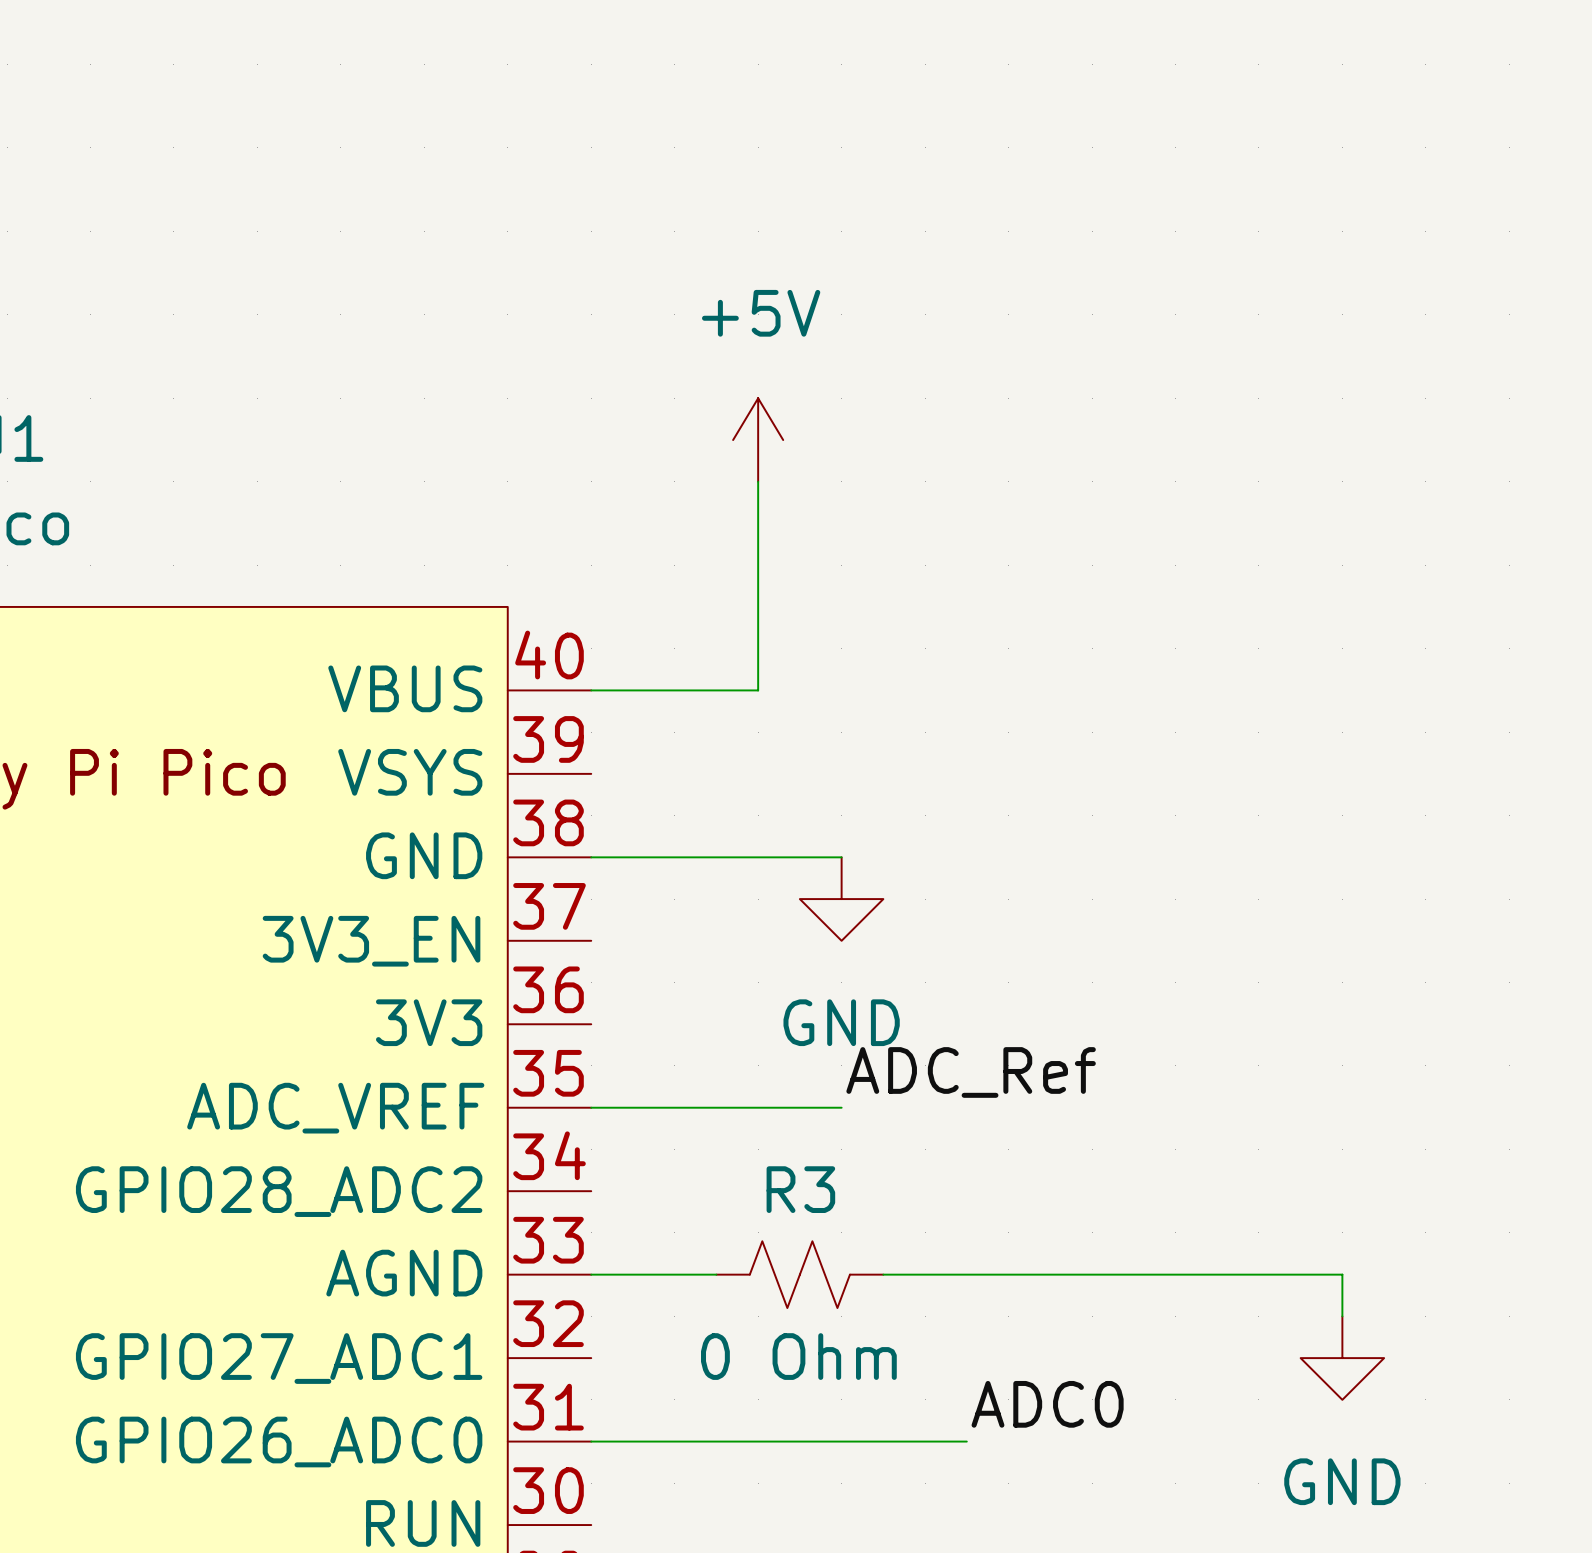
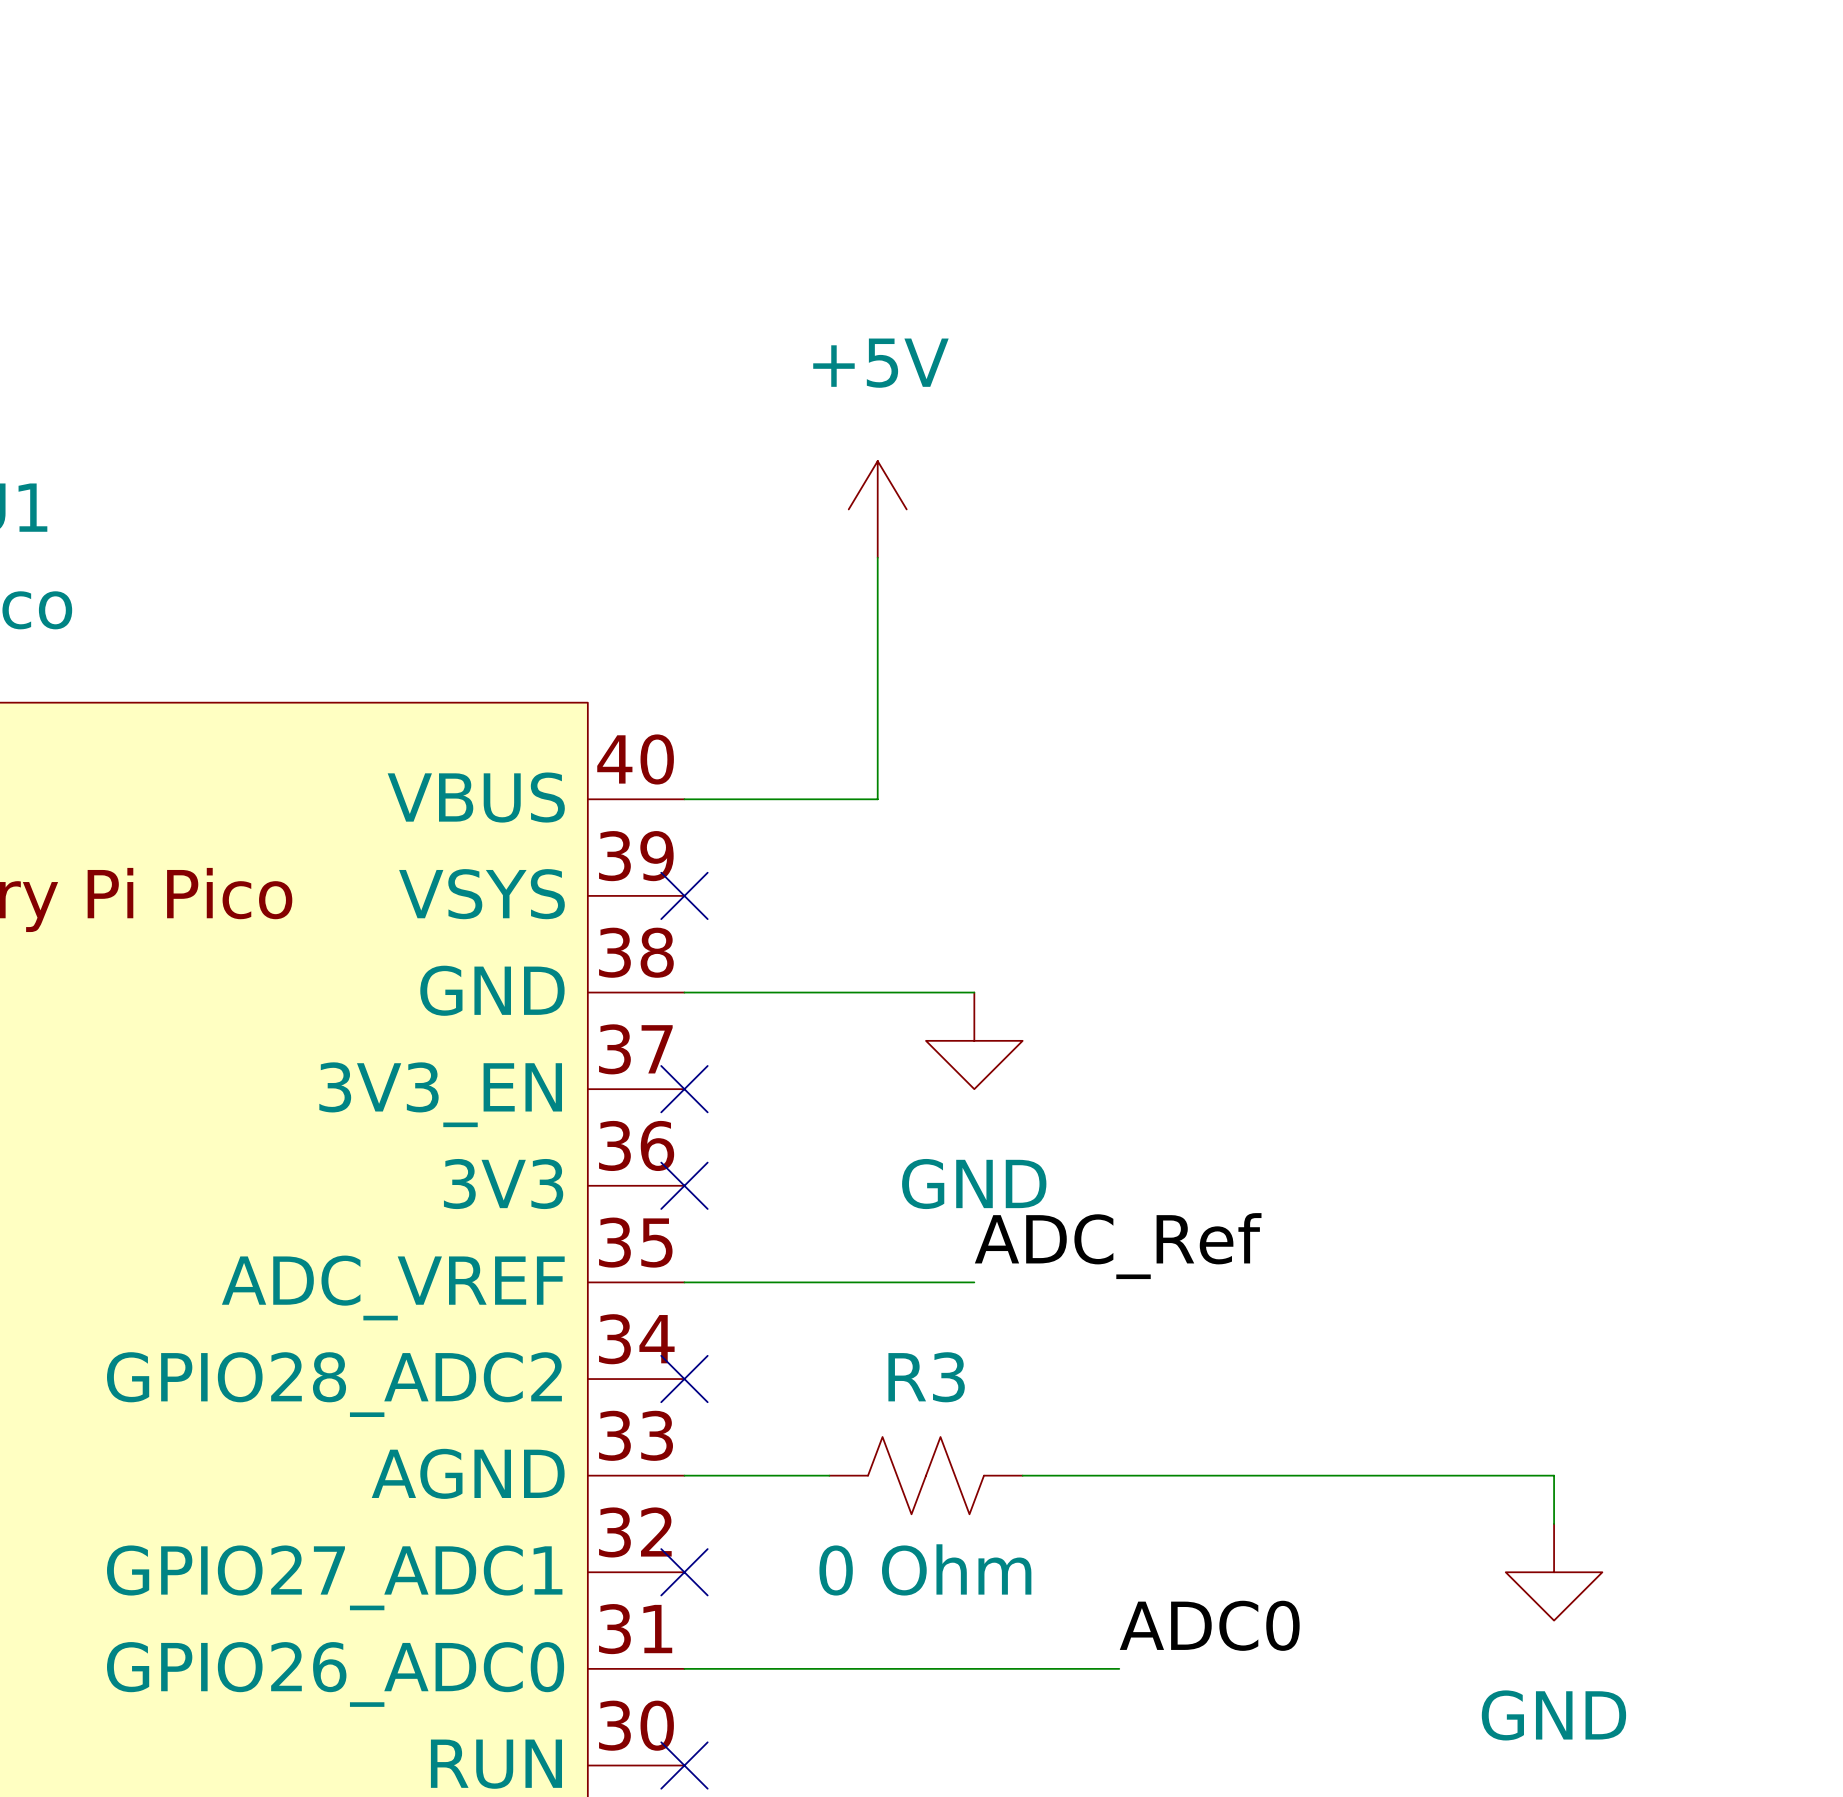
no-connect mark: none -> (684, 895)
no-connect mark: none -> (684, 1089)
no-connect mark: none -> (684, 1185)
no-connect mark: none -> (684, 1379)
no-connect mark: none -> (684, 1572)
no-connect mark: none -> (684, 1765)

